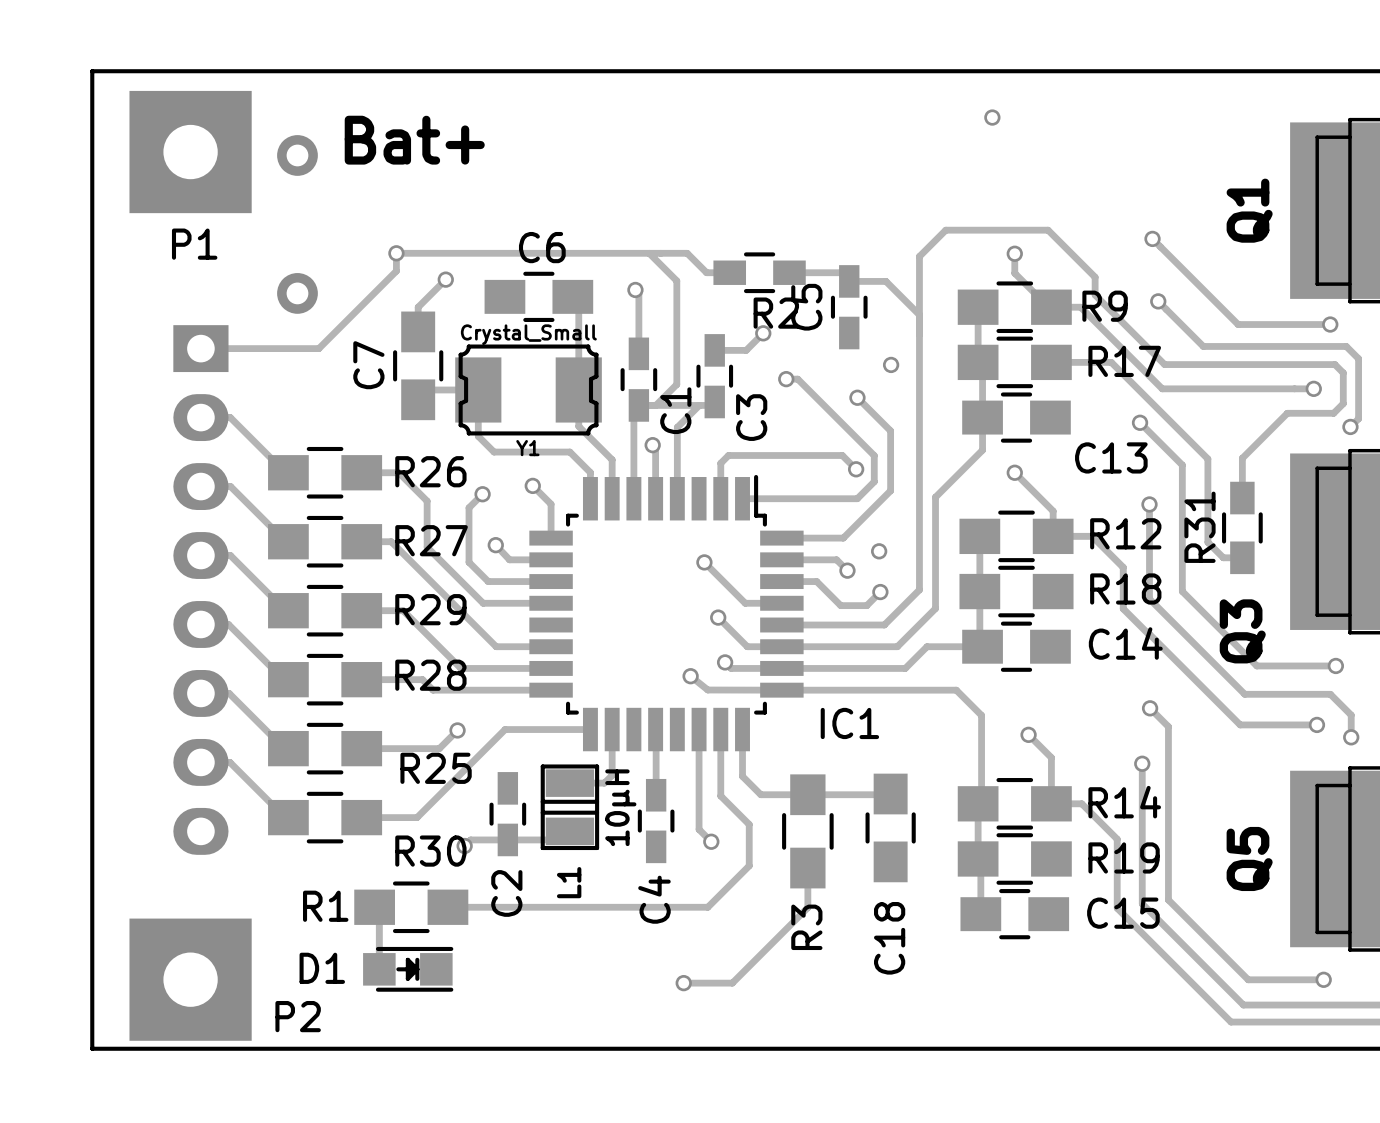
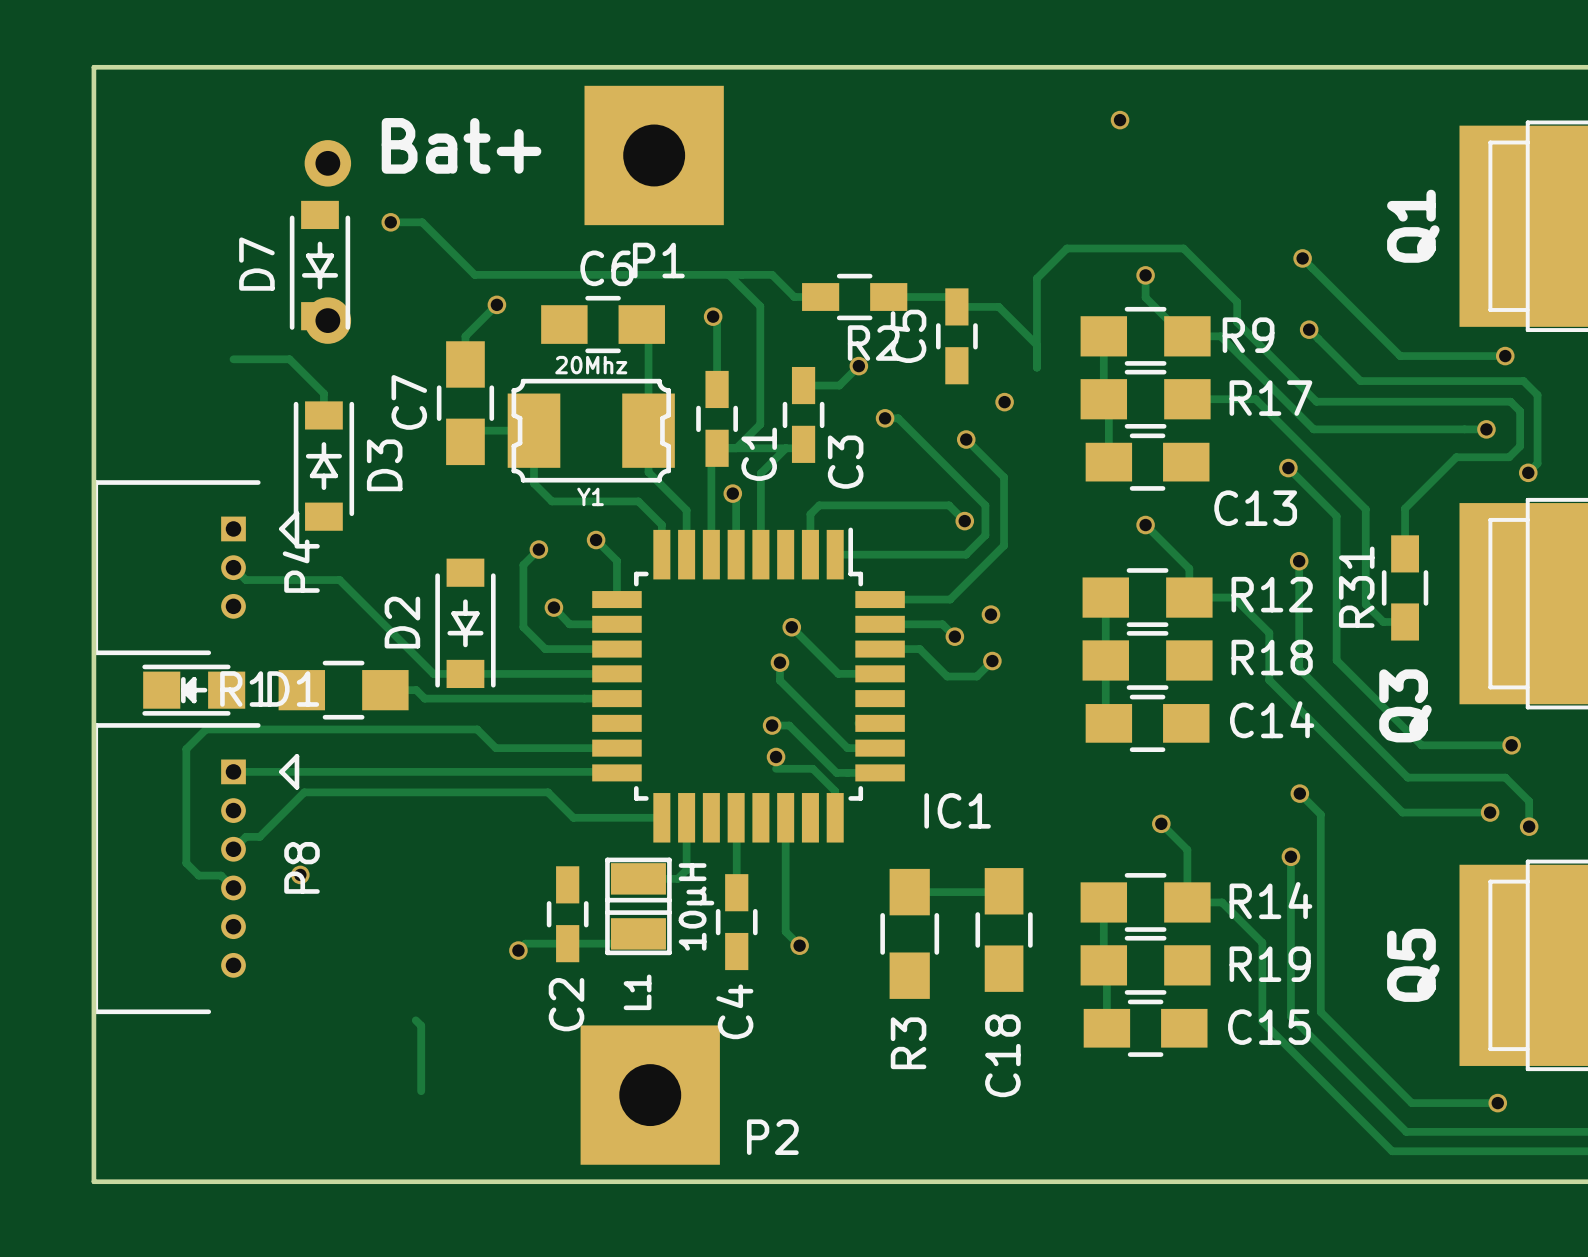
P1 position: (190, 152) -> (654, 155)
D7: none -> (320, 265)
via position: (396, 253) -> (390, 222)
track: (426, 253) (396, 253) (396, 271) (318, 348) (200, 348) -> (474, 274) (422, 222) (390, 222) (393, 224)
track: none -> (233, 359) (289, 359) (323, 393) (323, 415)
Y1 value: Crystal_Small (528, 334) -> 20Mhz (591, 365)
track: (919, 334) (919, 589) (884, 625) (781, 625) -> none
track: (200, 417) (230, 417) (285, 472) (288, 472) -> none
track: (982, 417) (982, 450) (935, 497) (935, 608) (897, 646) (781, 646) -> none
D3: none -> (323, 466)
R26: (325, 472) -> none
track: (361, 472) (398, 472) (427, 501) (427, 547) (483, 603) (551, 603) -> (233, 567) (245, 580) (339, 580) (433, 673) (616, 673)
track: (200, 486) (230, 486) (285, 541) (288, 541) -> none
P4: none -> (196, 567)
R27: (325, 541) -> none
track: (361, 541) (391, 541) (496, 646) (551, 646) -> none
track: (200, 555) (230, 555) (285, 610) (288, 610) -> none
D2: none -> (465, 623)
part: (200, 589) -> none
via: none -> (779, 662)
R29: (325, 610) -> none
track: (361, 610) (403, 610) (460, 668) -> (233, 887) (221, 875) (198, 875) (186, 863) (186, 749) (205, 729) (477, 729) (495, 748) (514, 748)
track: none -> (385, 690) (416, 690) (424, 698) (616, 698)
track: (718, 617) (747, 646) (762, 646) -> none
via: (718, 617) -> none
track: (200, 624) (228, 624) (283, 679) (288, 679) -> none
track: (982, 646) (927, 646) (905, 668) (796, 668) -> none
via: none -> (772, 725)
track: (725, 662) (731, 668) (753, 668) -> (779, 662) (779, 680) (847, 748)
via: (725, 662) -> none
track: (690, 676) (707, 690) (781, 690) -> (772, 725) (789, 725) (836, 772) (880, 772)
R28: (325, 679) -> none
track: (361, 679) (422, 679) (433, 690) (551, 690) -> (233, 771) (616, 772)
track: (790, 690) (956, 690) (981, 715) (981, 800) -> none
track: (200, 693) (229, 693) (284, 748) (288, 748) -> none
track: (512, 729) (505, 729) (417, 817) (361, 817) -> (573, 817) (548, 792) (304, 792) (259, 836) (245, 836) (233, 849)
track: (720, 729) (720, 796) (749, 824) (749, 865) (707, 907) (447, 907) -> none
track: (742, 729) (742, 776) (760, 794) (807, 794) -> (835, 817) (835, 791) (812, 768) (776, 768)
track: (457, 730) (439, 748) (361, 748) -> none
via: (457, 730) -> none
R25: (325, 748) -> none
track: (200, 762) (230, 762) (285, 817) (288, 817) -> none
P8: none -> (196, 868)
via: none -> (300, 874)
R30: (325, 817) -> none
track: (807, 868) (807, 907) (732, 983) (683, 983) -> none
R1 position: (411, 907) -> (343, 690)
D1 rotation: 0° (408, 969) -> 180° (193, 690)
D1 position: (408, 969) -> (193, 690)
P2 position: (190, 979) -> (650, 1095)
via: (683, 983) -> none

